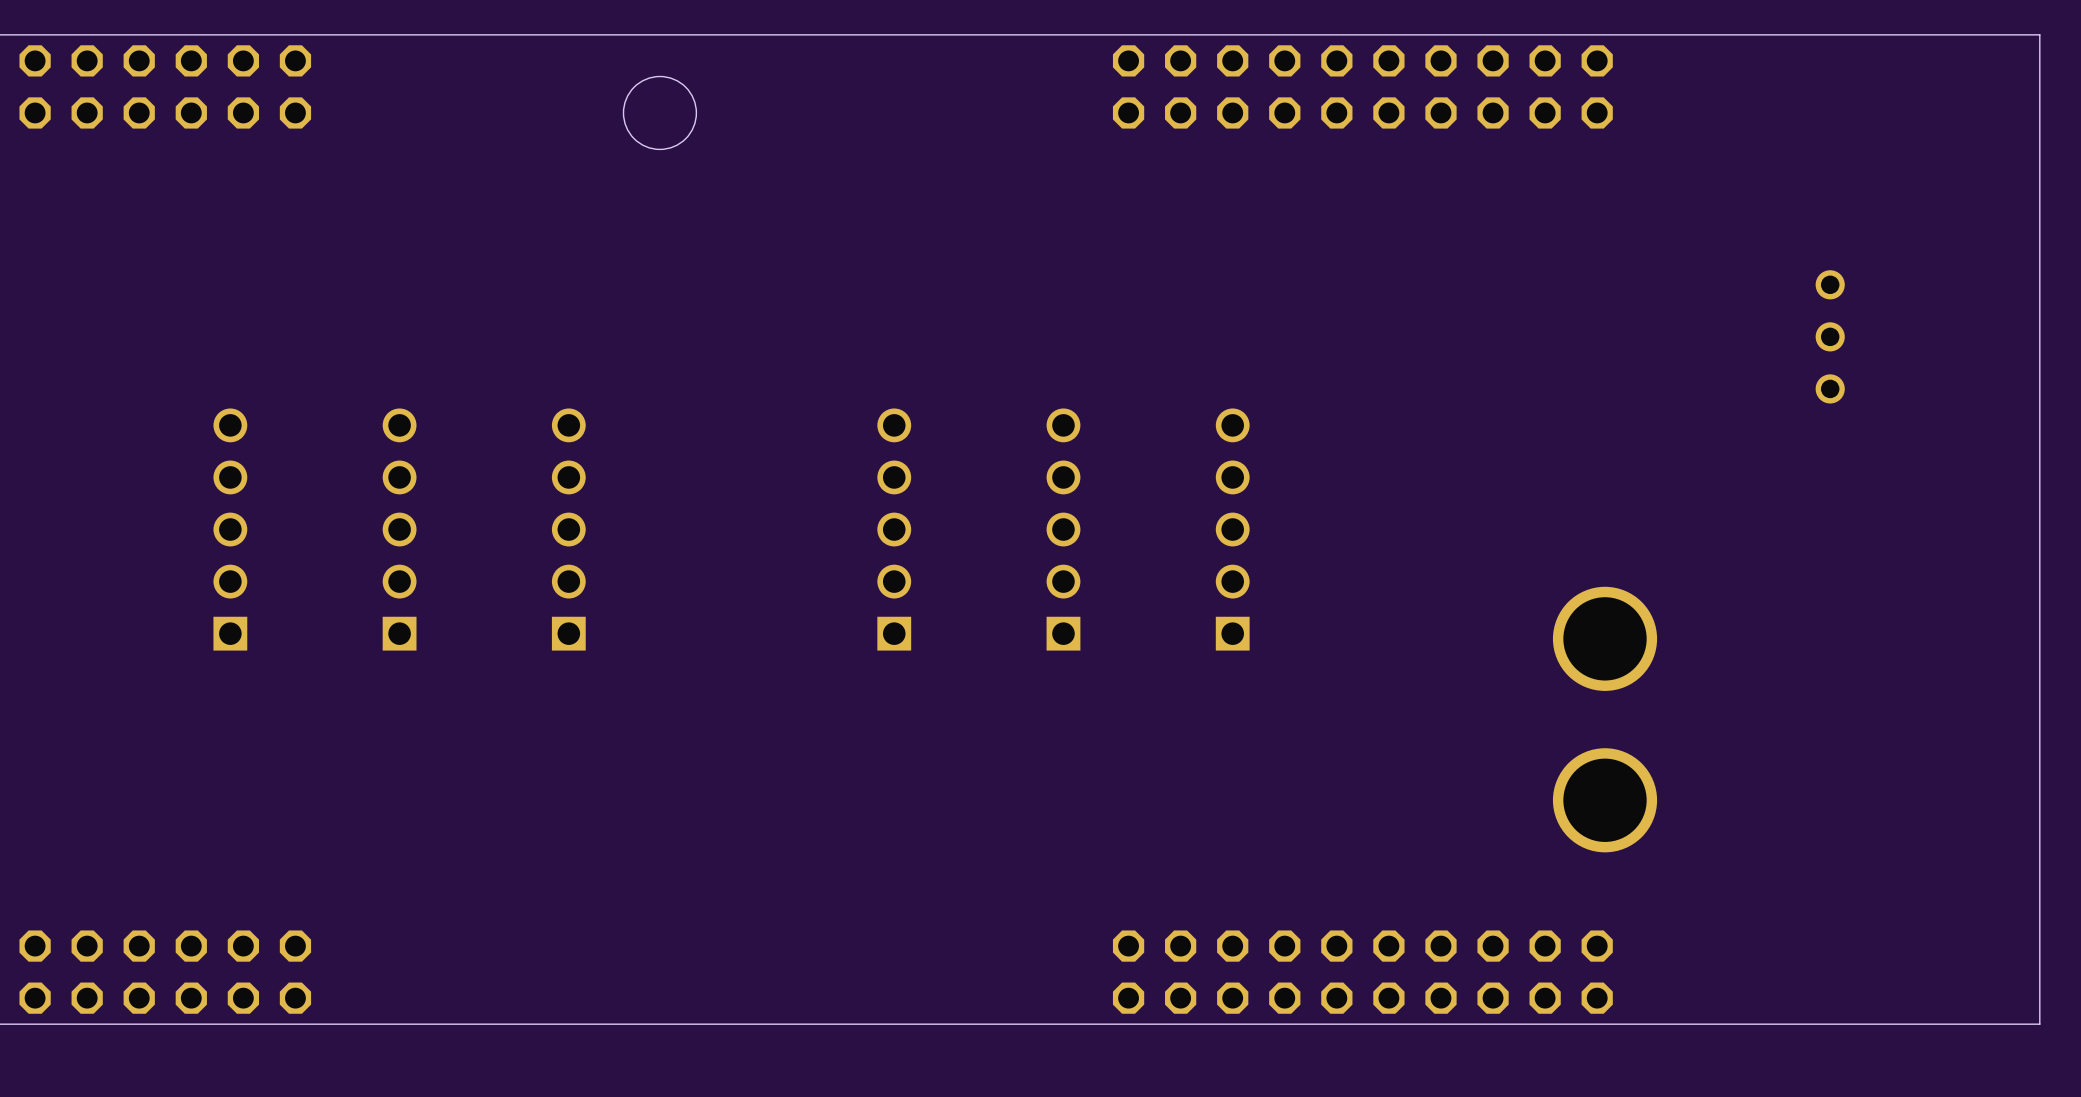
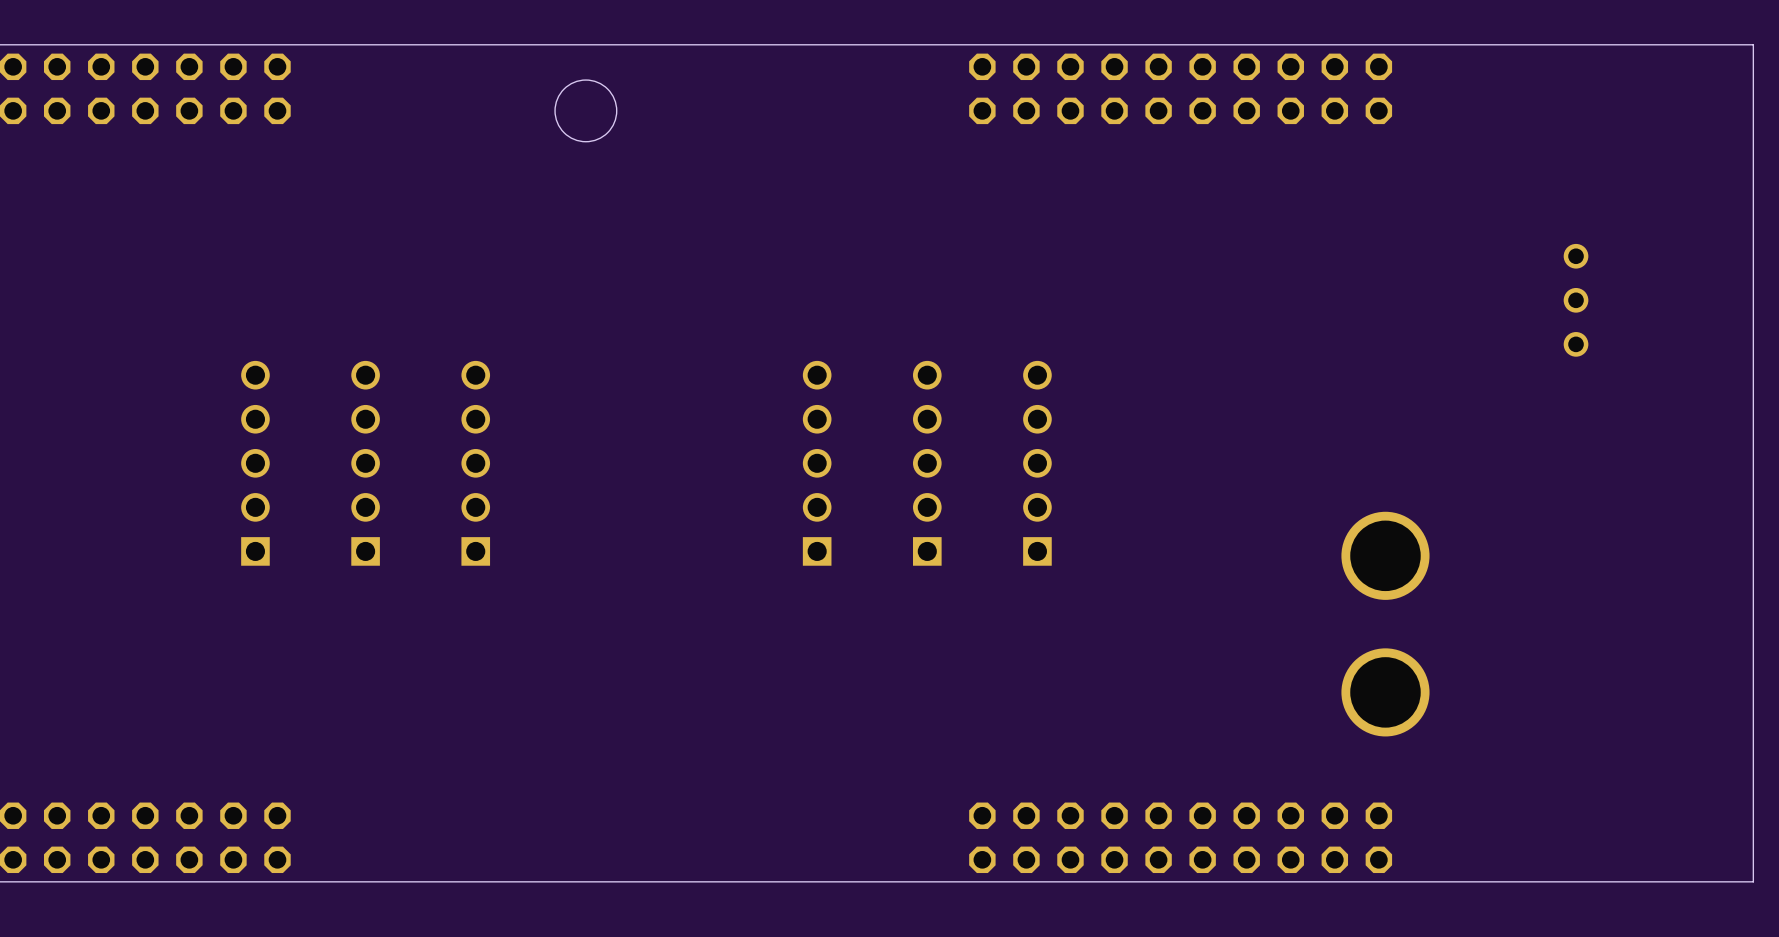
part position: (230, 529) -> (255, 463)
part position: (568, 529) -> (475, 463)
part position: (894, 529) -> (817, 463)
part position: (1232, 529) -> (1037, 463)

